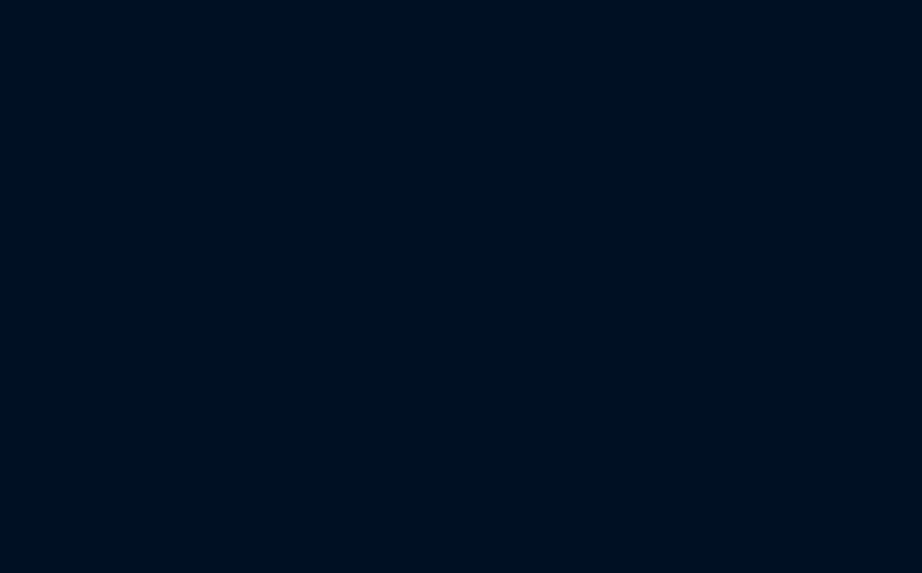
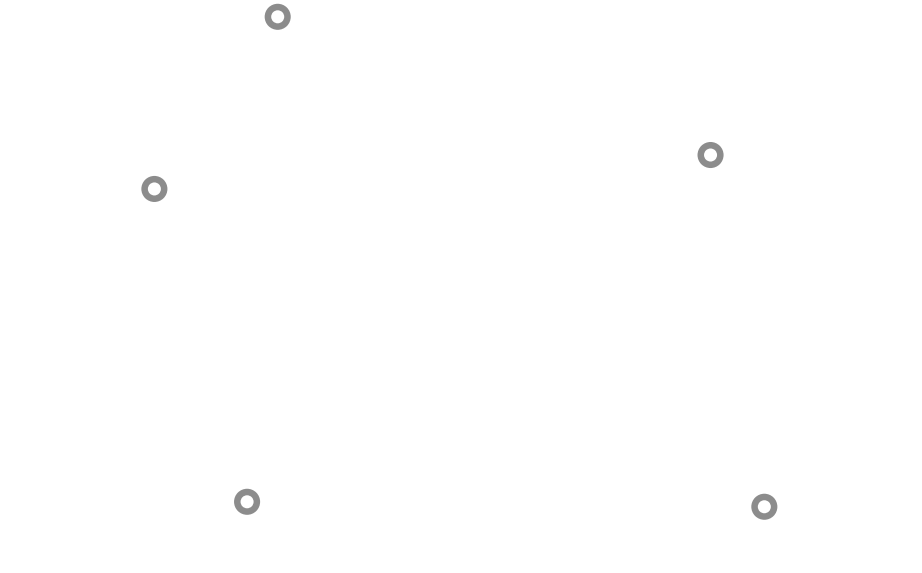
via: none -> (277, 16)
via: none -> (710, 155)
via: none -> (154, 188)
via: none -> (247, 501)
via: none -> (764, 506)

